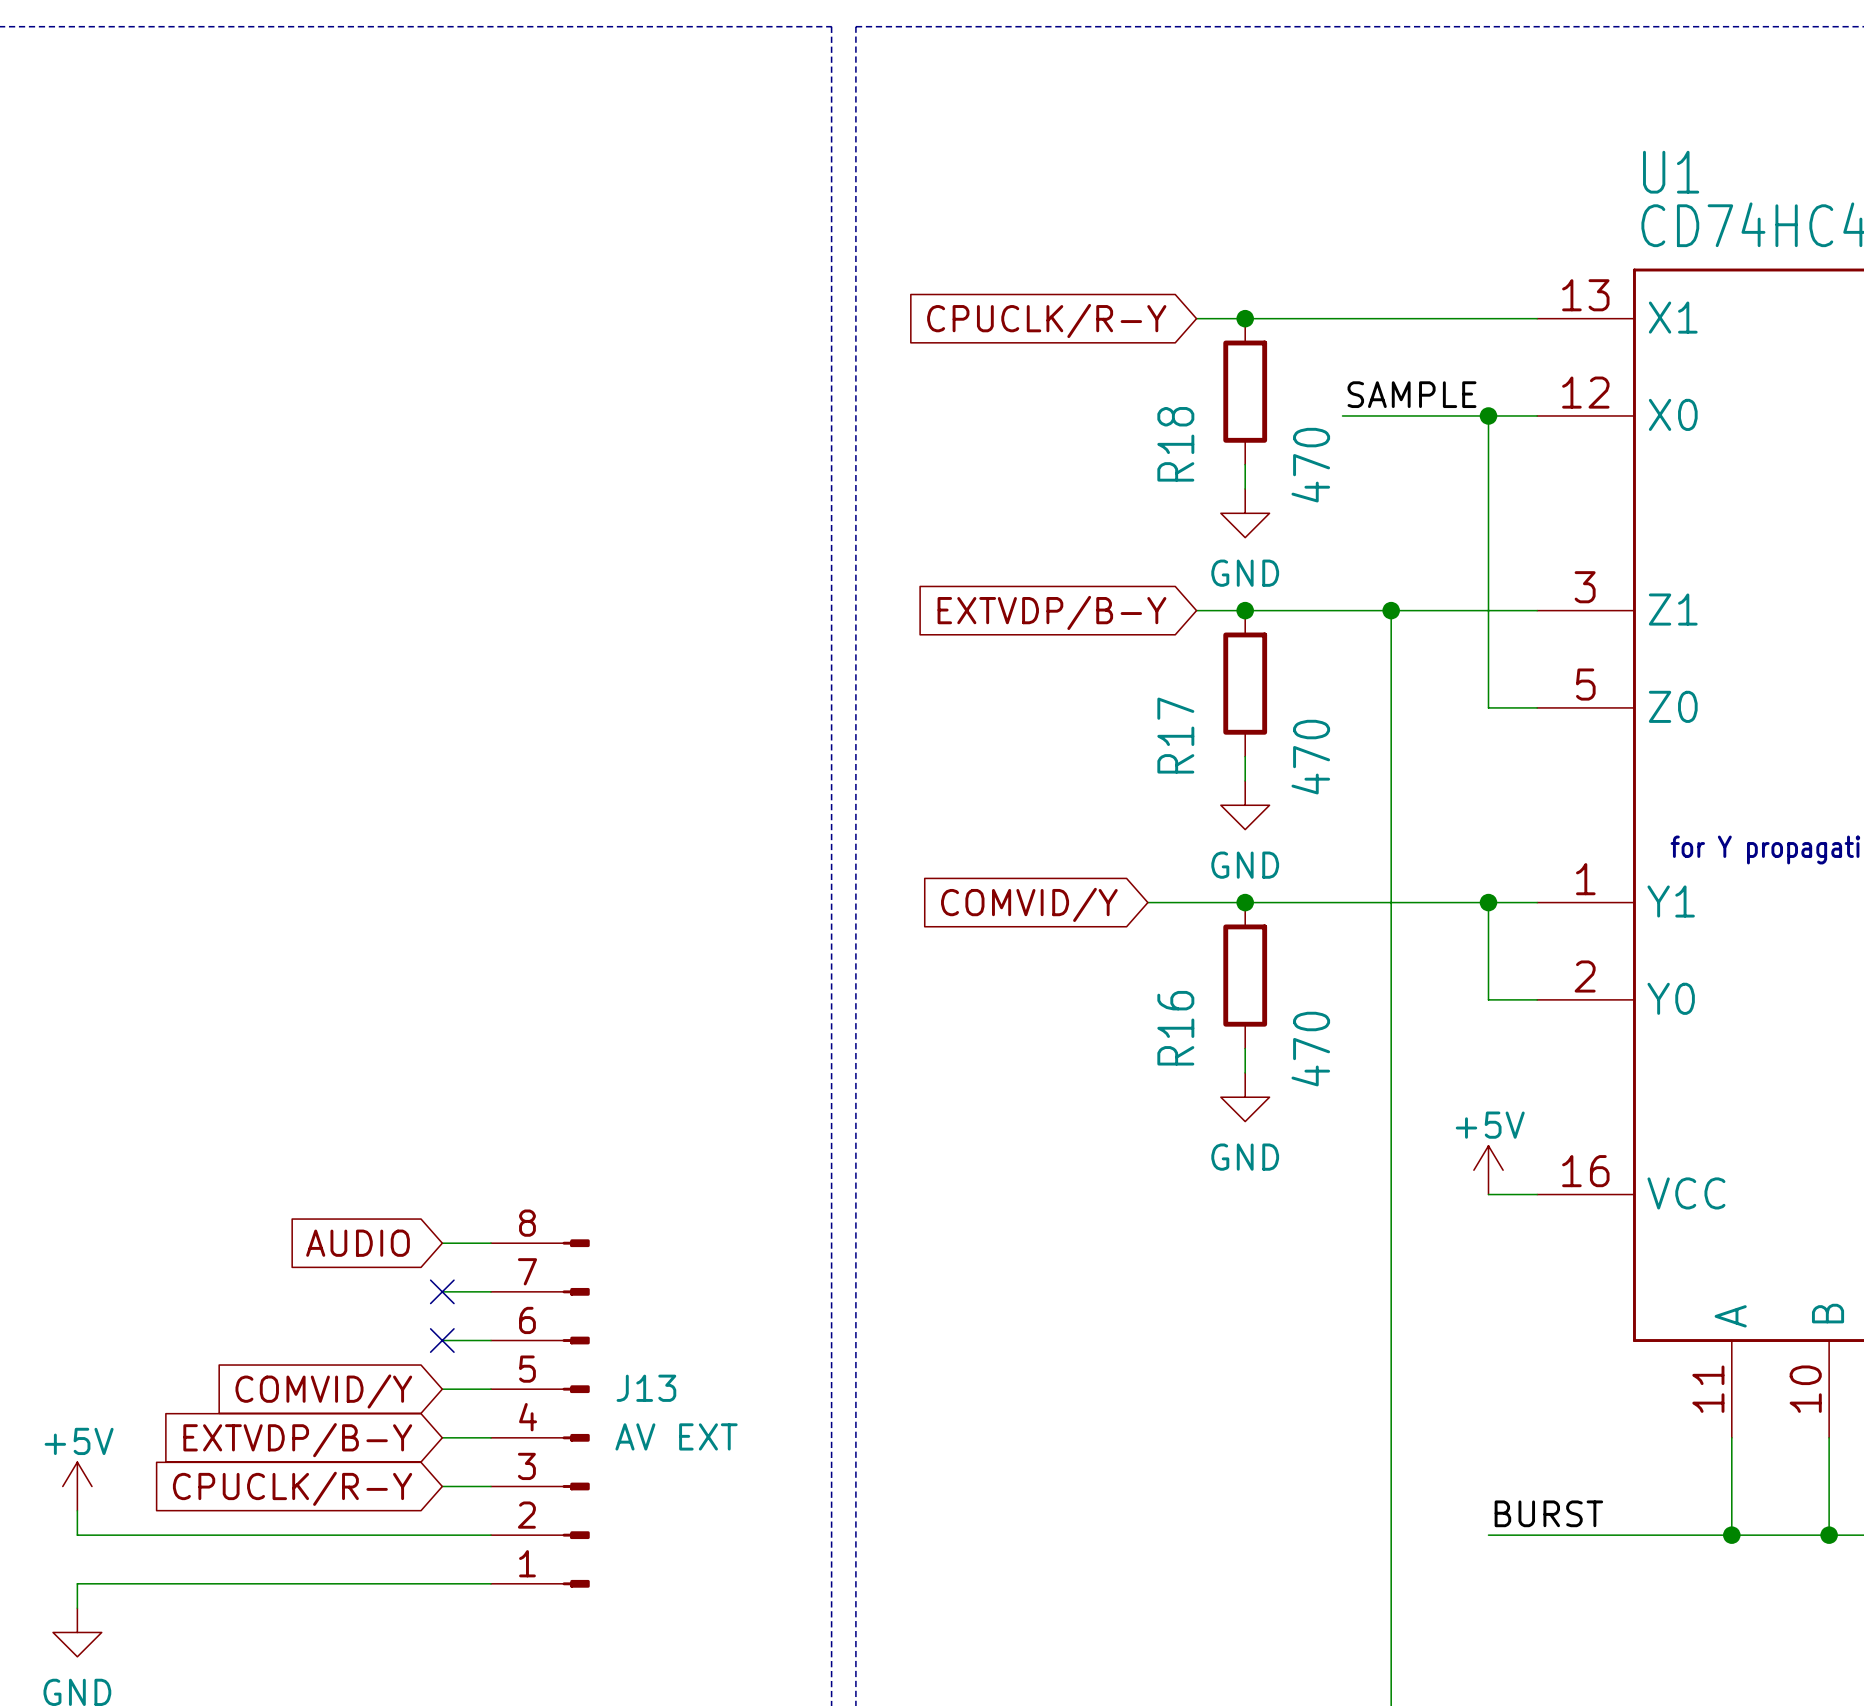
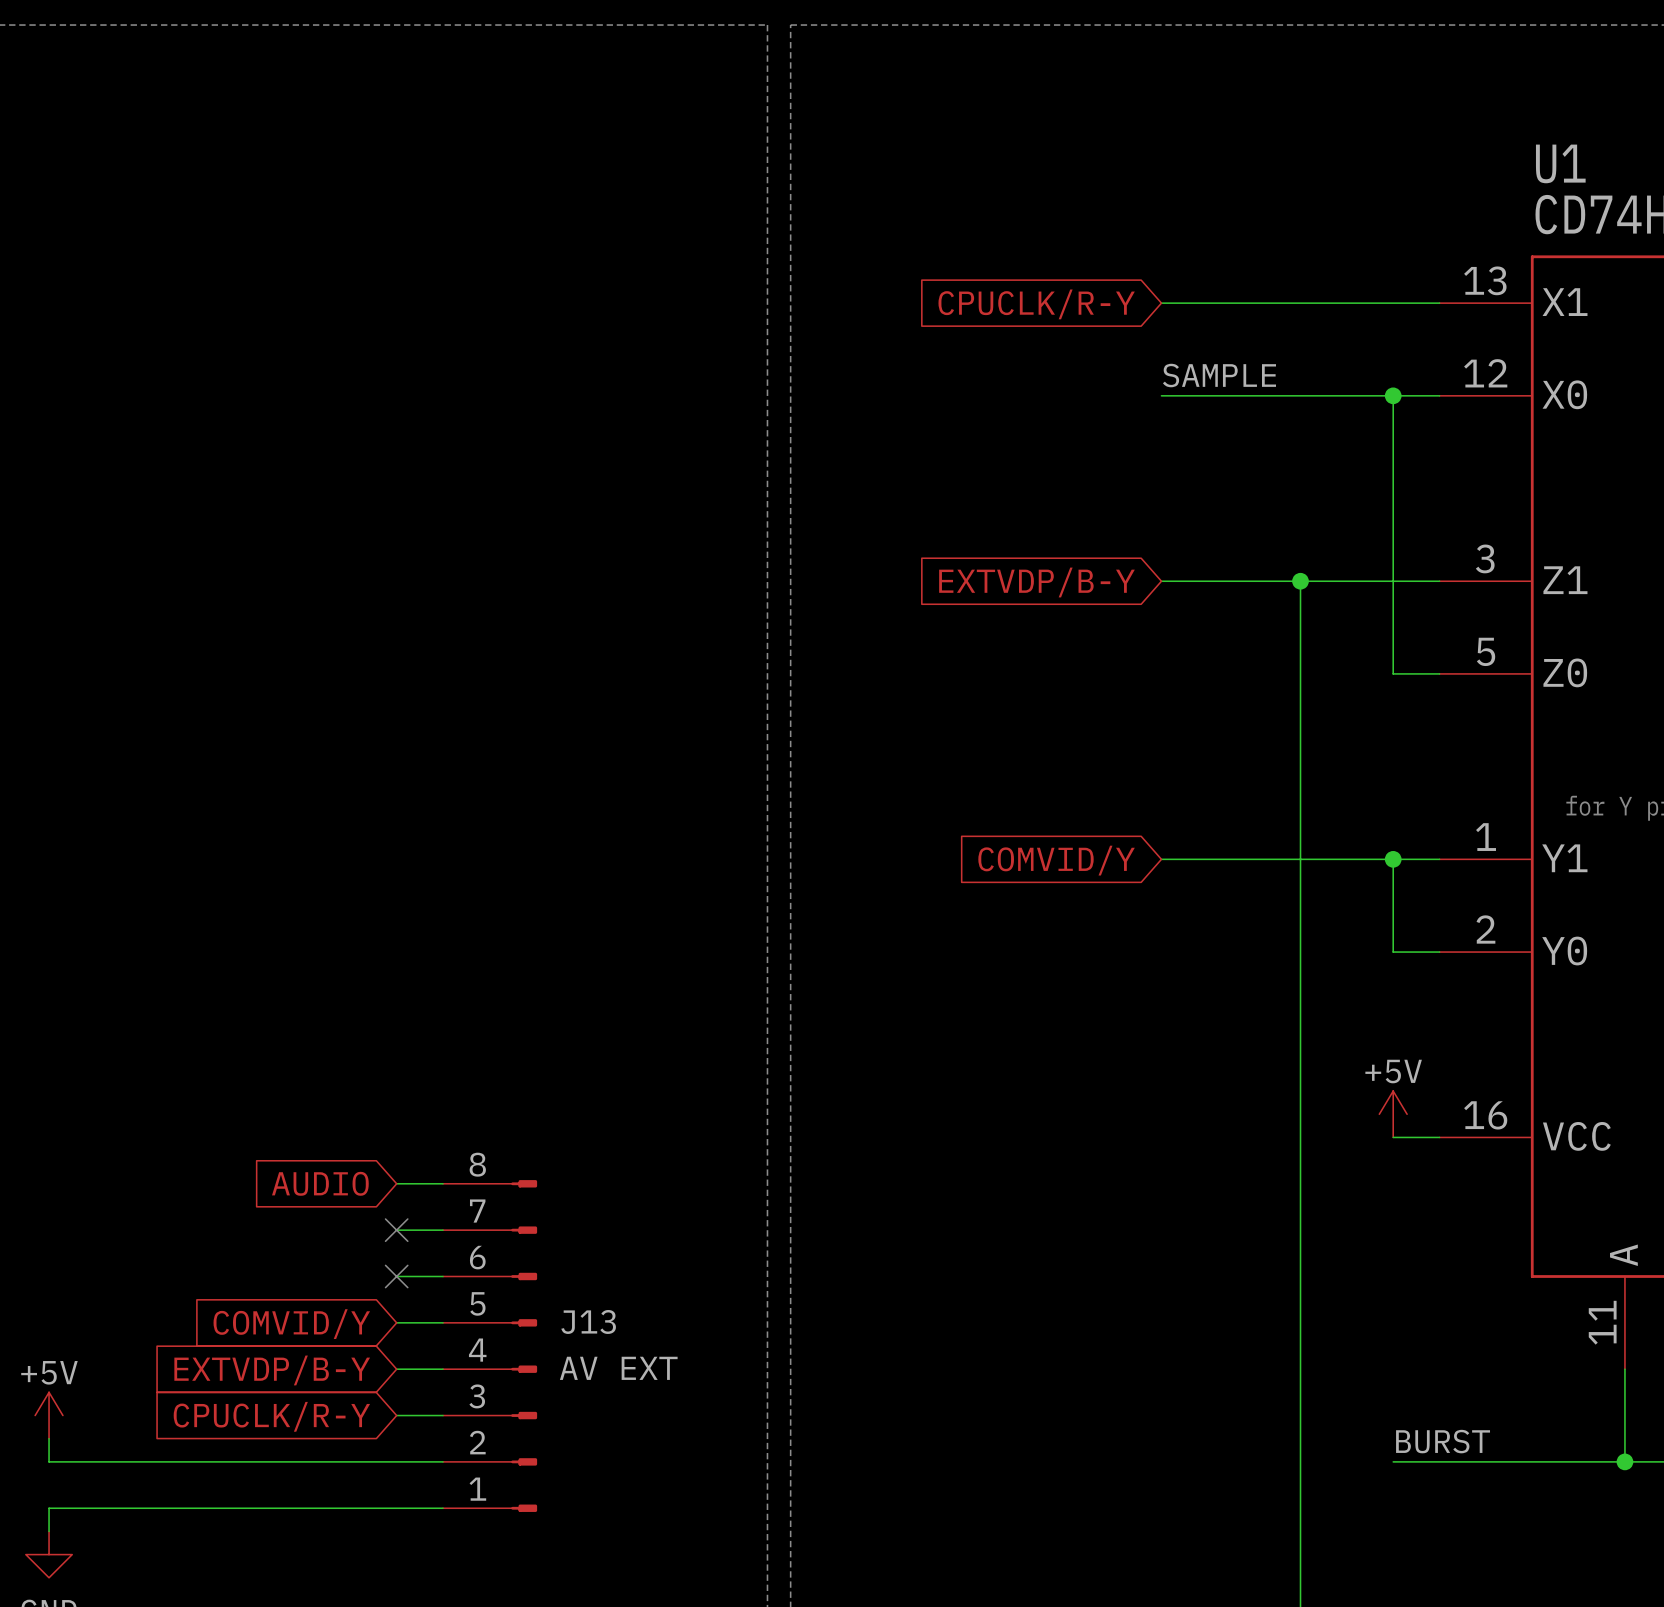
wire: (1196, 318) (1245, 318) -> none
junction: (1245, 318) -> none
global label position: CPUCLK/R-Y (1046, 320) -> CPUCLK/R-Y (1036, 304)
R18: 470 (1245, 391) -> none
label position: SAMPLE (1412, 394) -> SAMPLE (1219, 375)
wire: none -> (1161, 395) (1254, 395)
wire: (1245, 464) (1245, 488) -> none
power symbol: GND (1245, 513) -> none
wire: (1196, 610) (1245, 610) -> none
junction: (1245, 610) -> none
global label position: EXTVDP/B-Y (1051, 612) -> EXTVDP/B-Y (1036, 582)
R17: 470 (1245, 683) -> none
wire: (1245, 756) (1245, 780) -> none
power symbol: GND (1245, 805) -> none
wire: (1147, 902) (1245, 902) -> none
junction: (1245, 902) -> none
global label position: COMVID/Y (1029, 904) -> COMVID/Y (1056, 860)
R16: 470 (1245, 975) -> none
wire: (1245, 1048) (1245, 1072) -> none
power symbol: GND (1245, 1097) -> none

